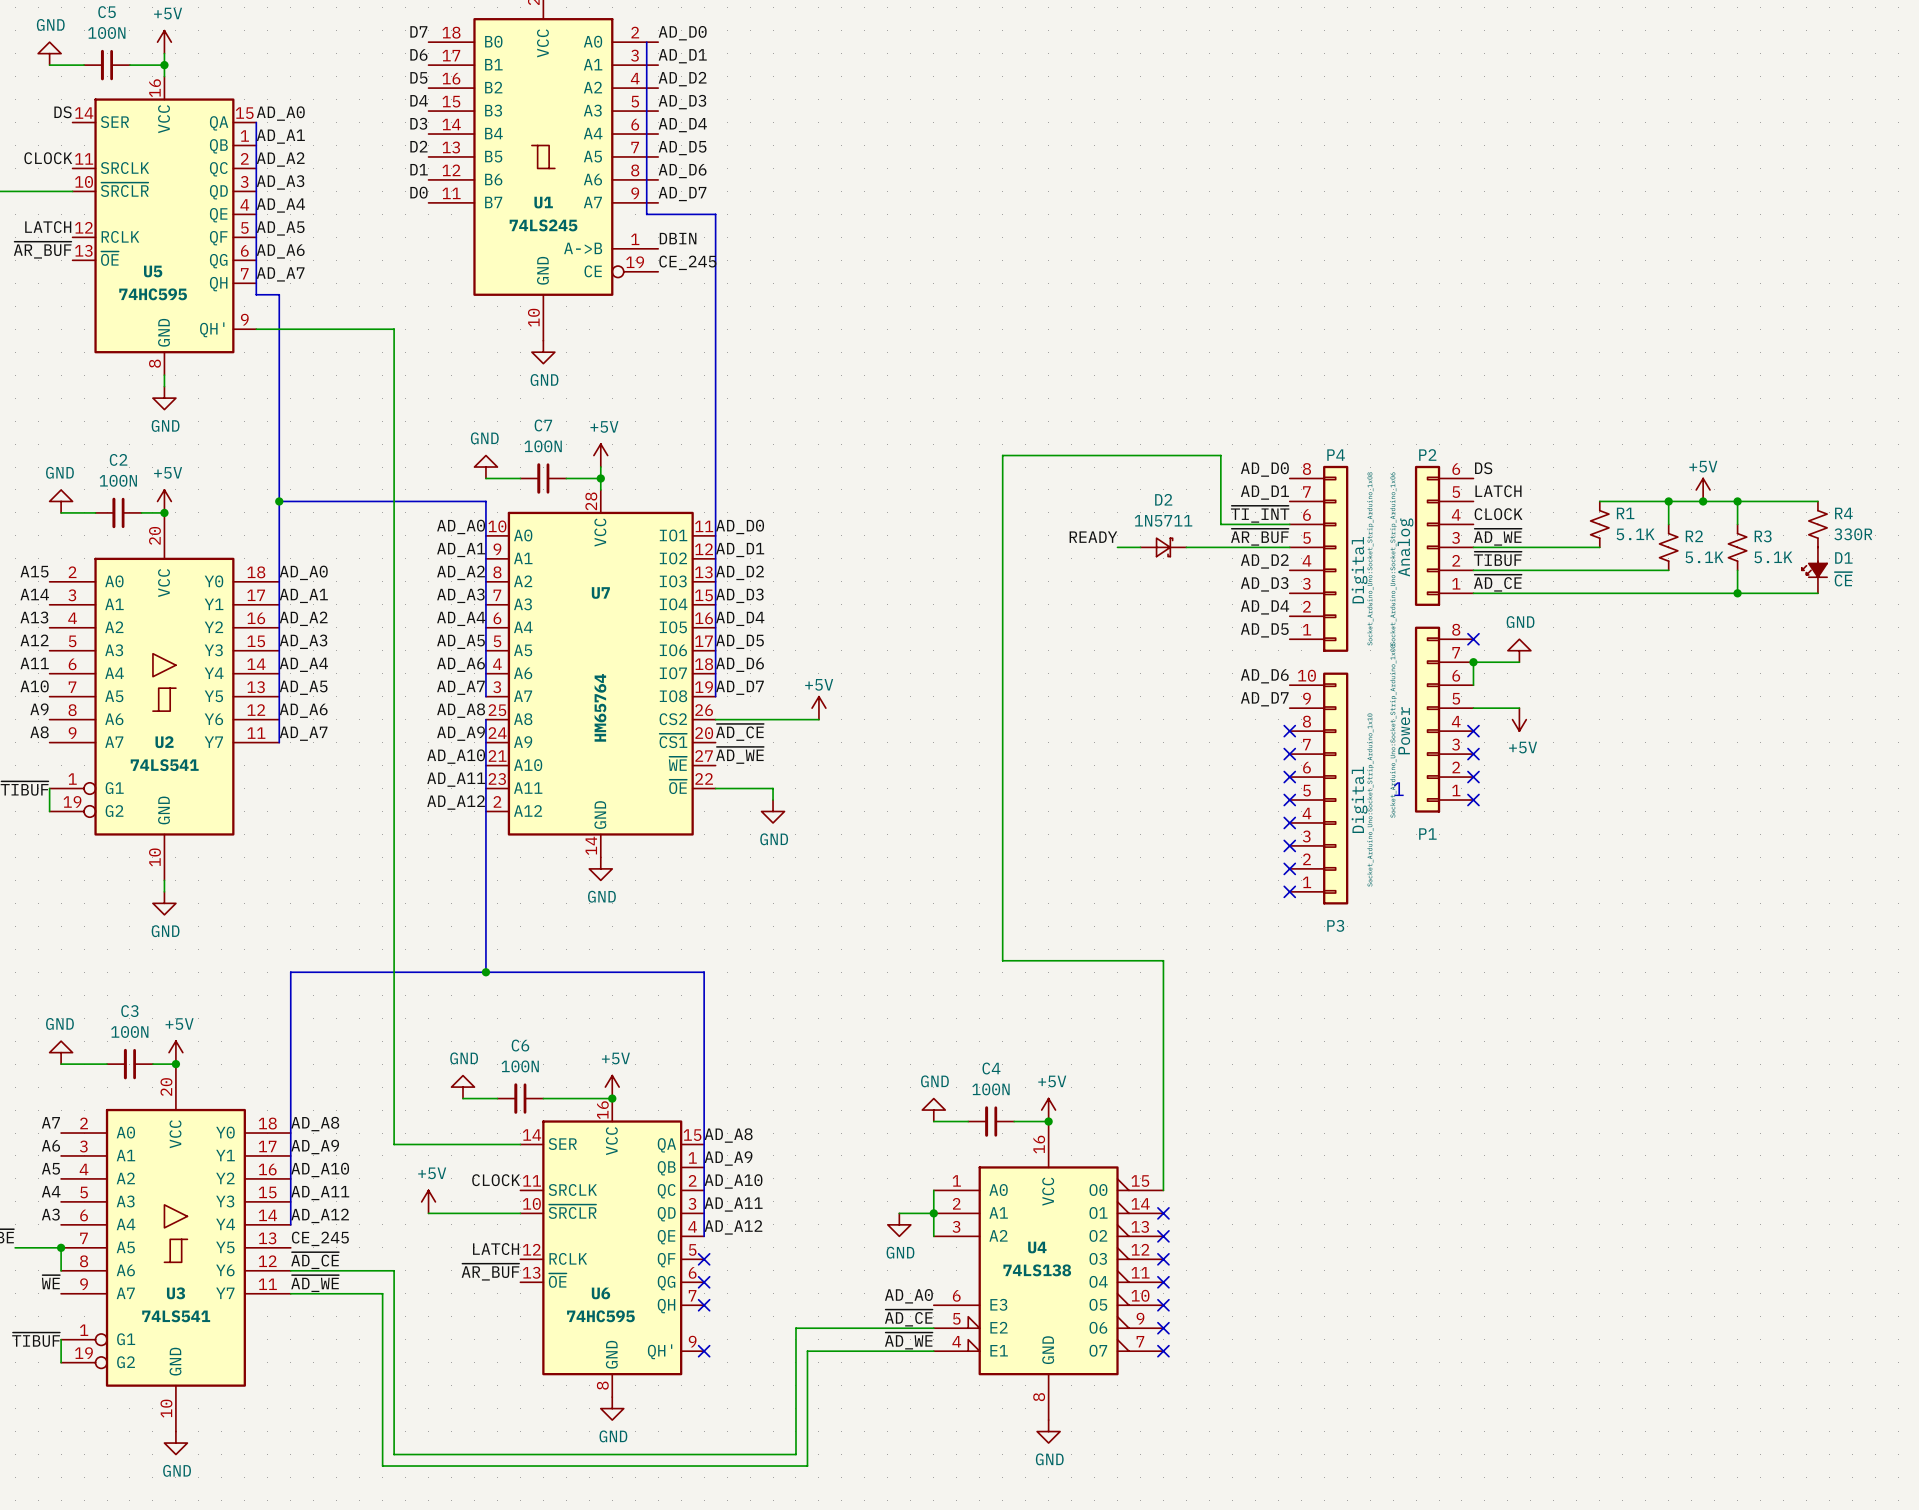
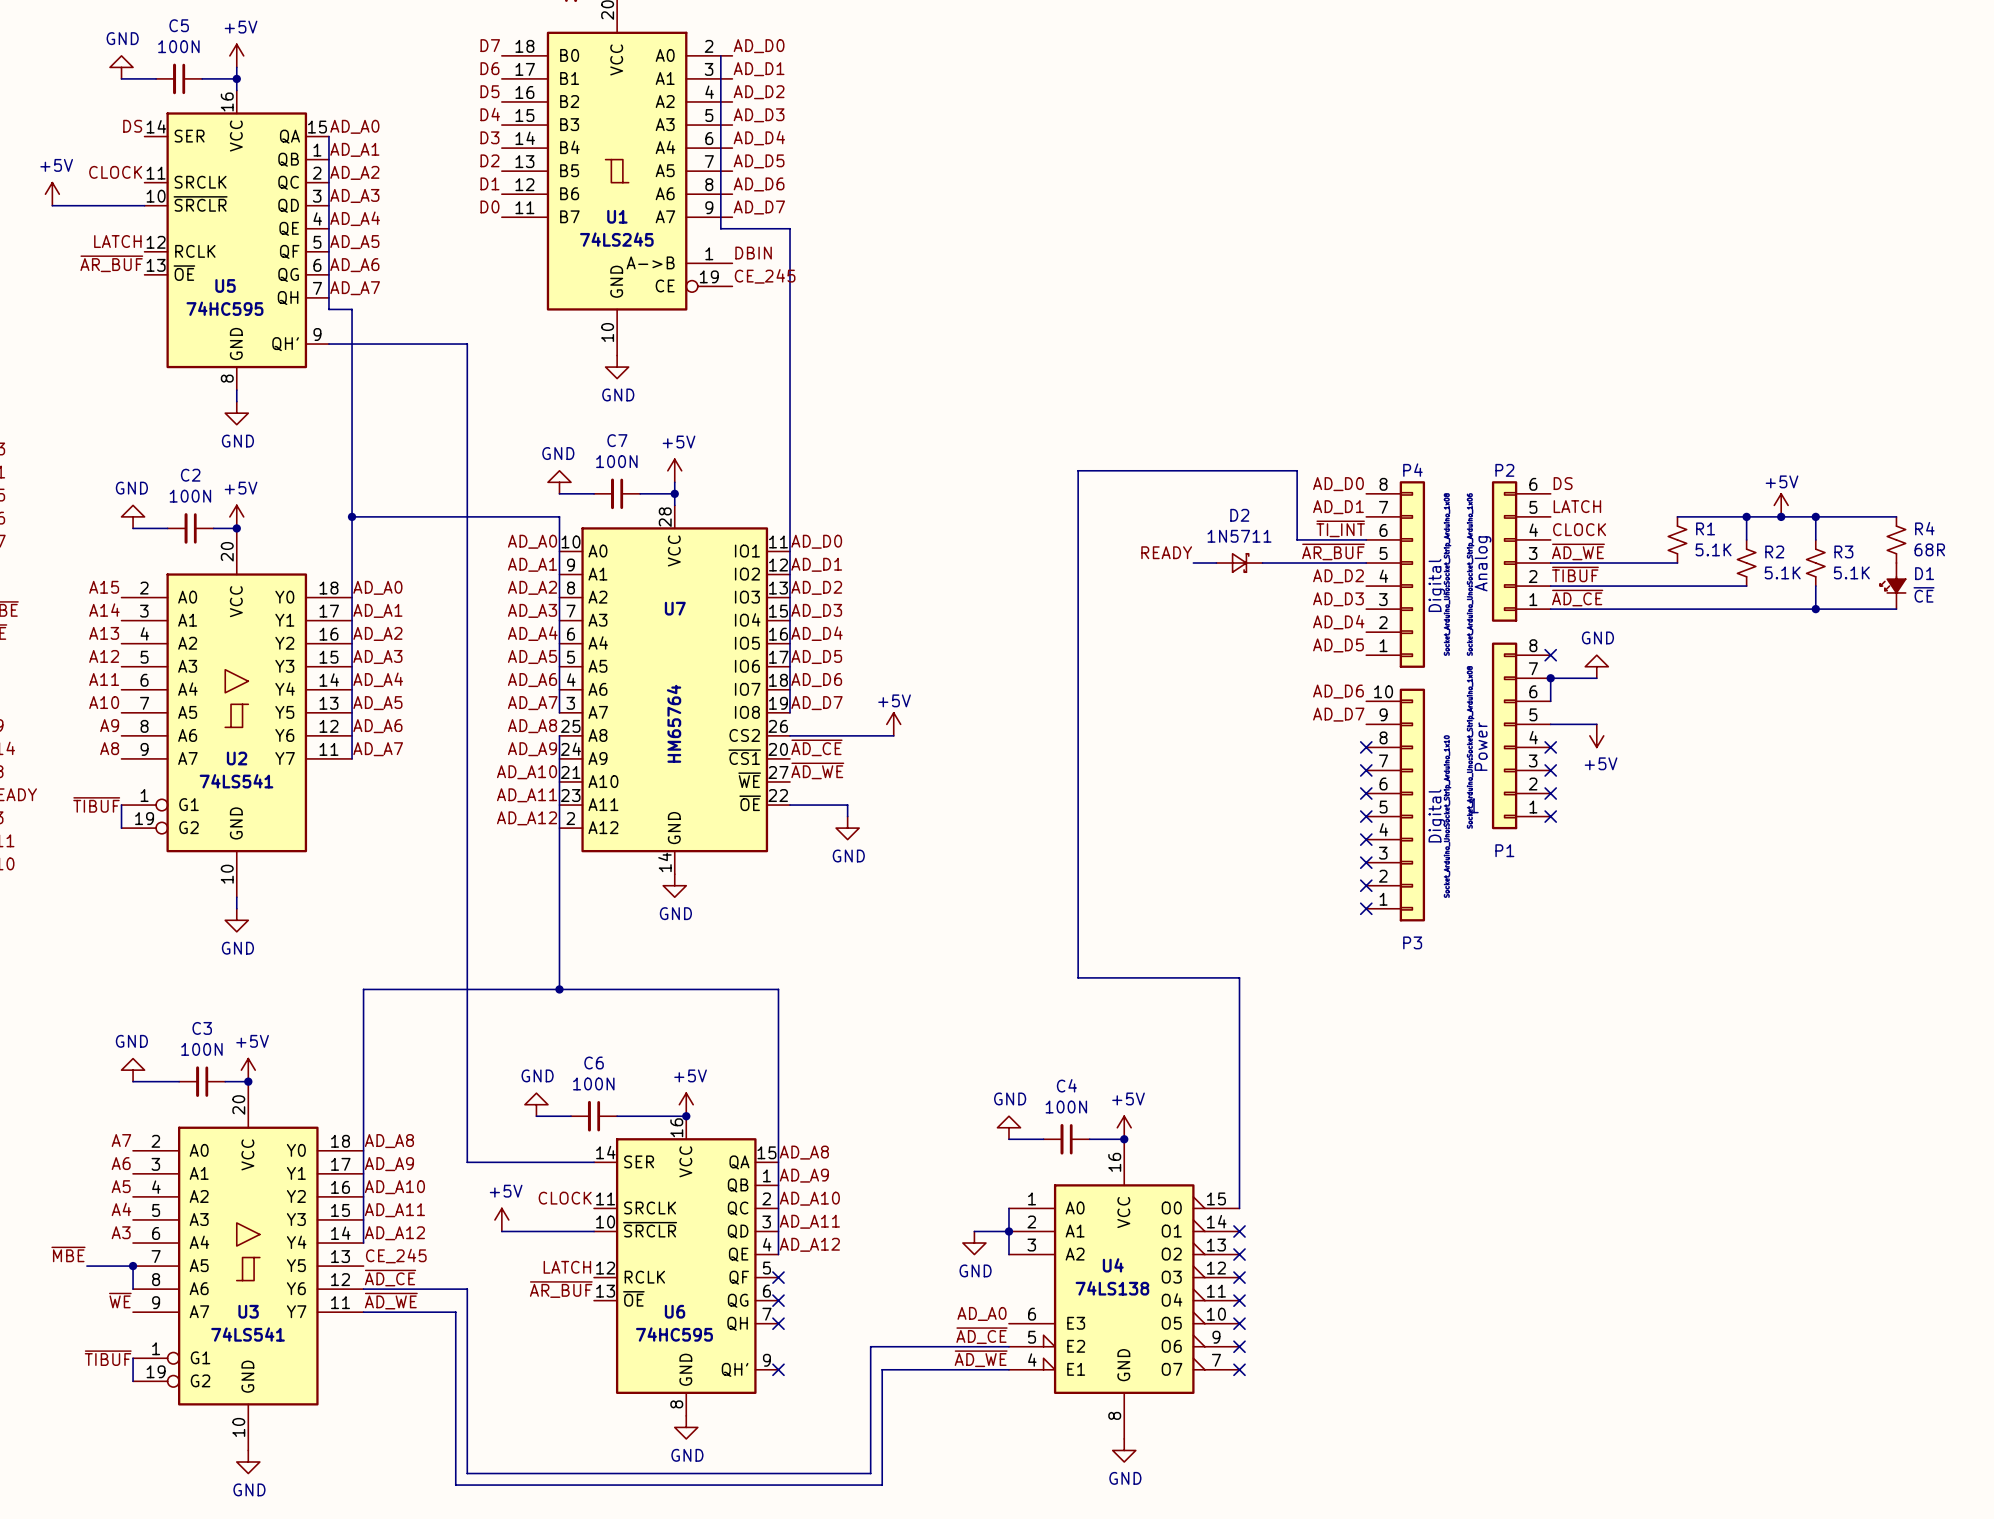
R4 value: 330R (1853, 534) -> 68R (1929, 549)

